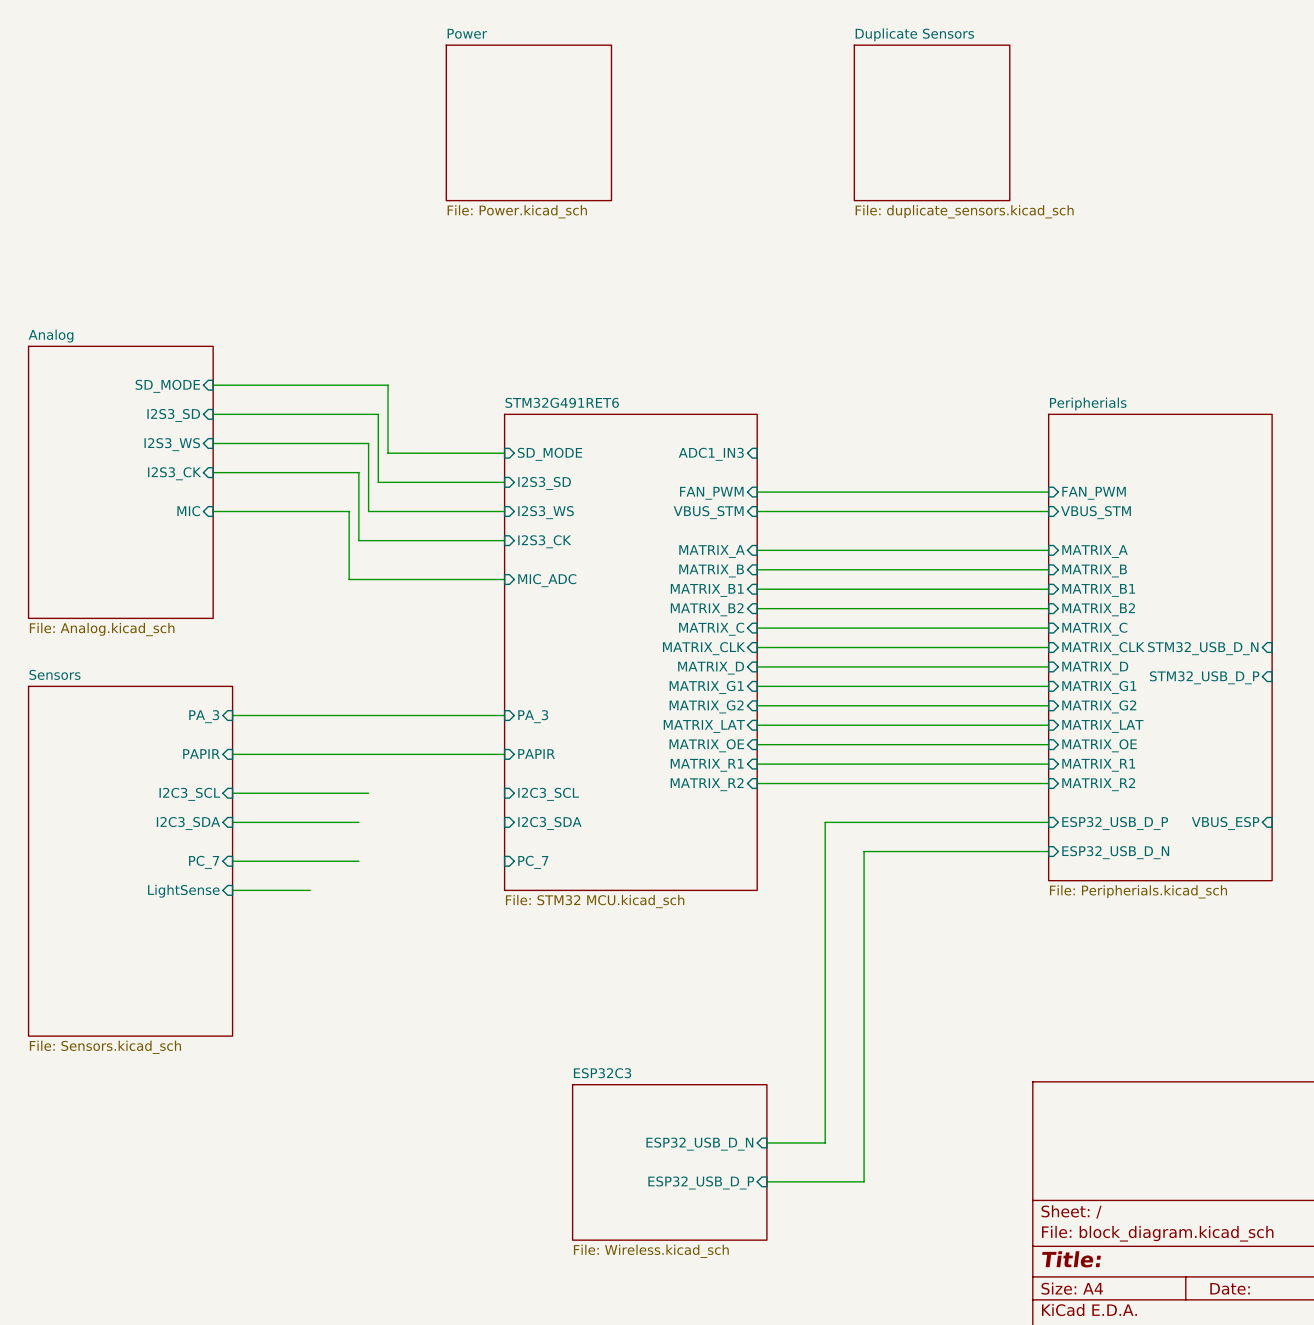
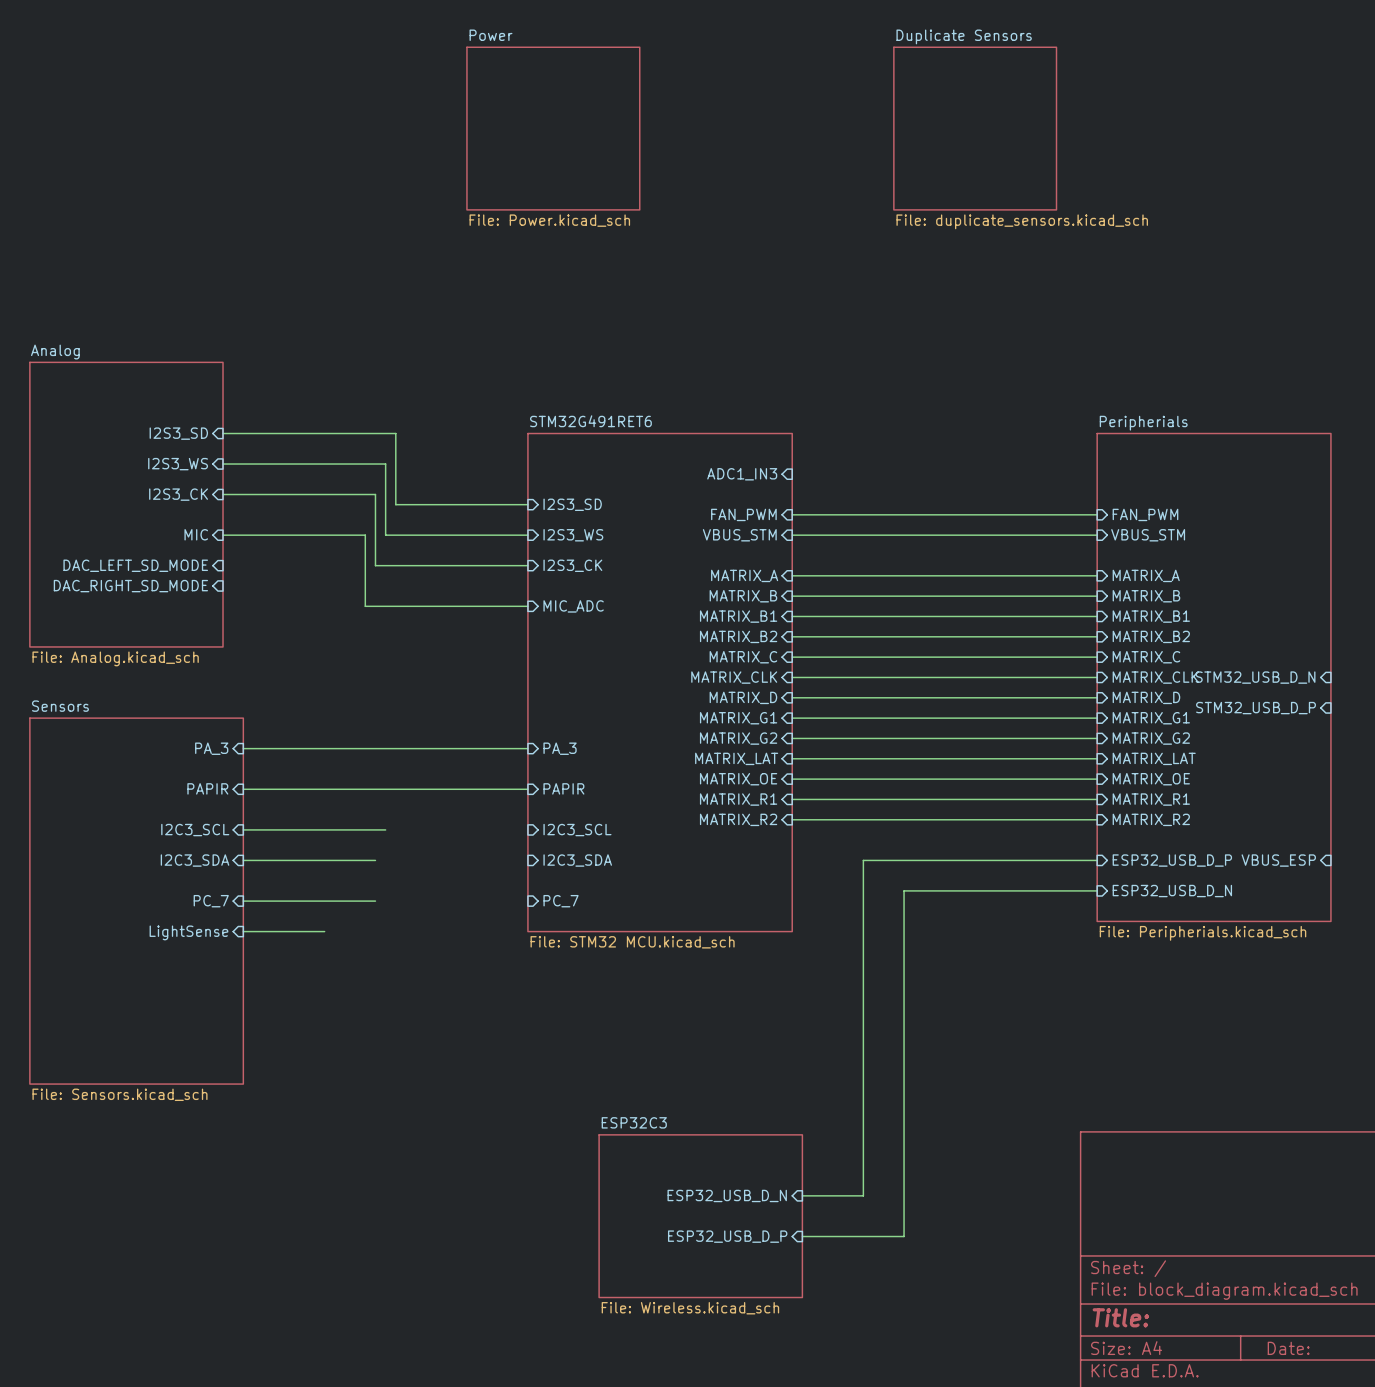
wire: (213, 385) (388, 385) (388, 453) (504, 453) -> none
sheet pin: SD_MODE (167, 386) -> none
sheet pin: SD_MODE (549, 454) -> none
sheet pin: none -> DAC_LEFT_SD_MODE (135, 565)
sheet pin: none -> DAC_RIGHT_SD_MODE (130, 586)

